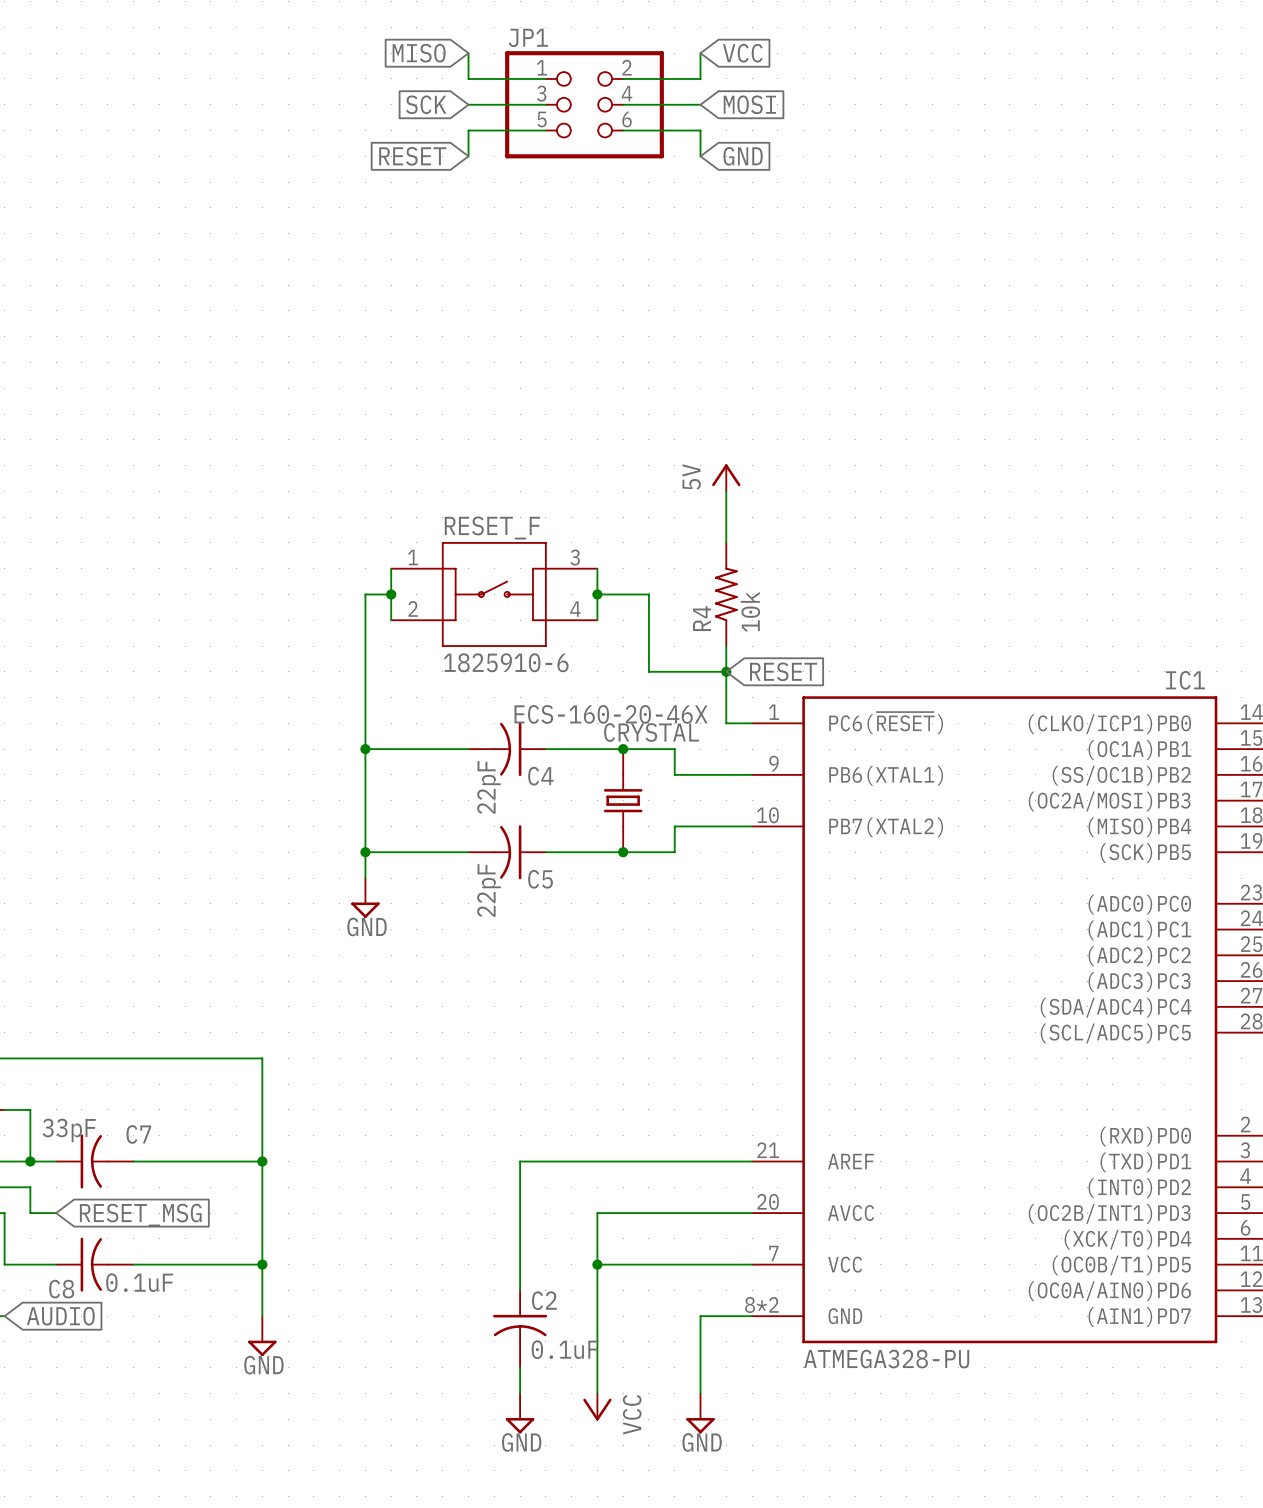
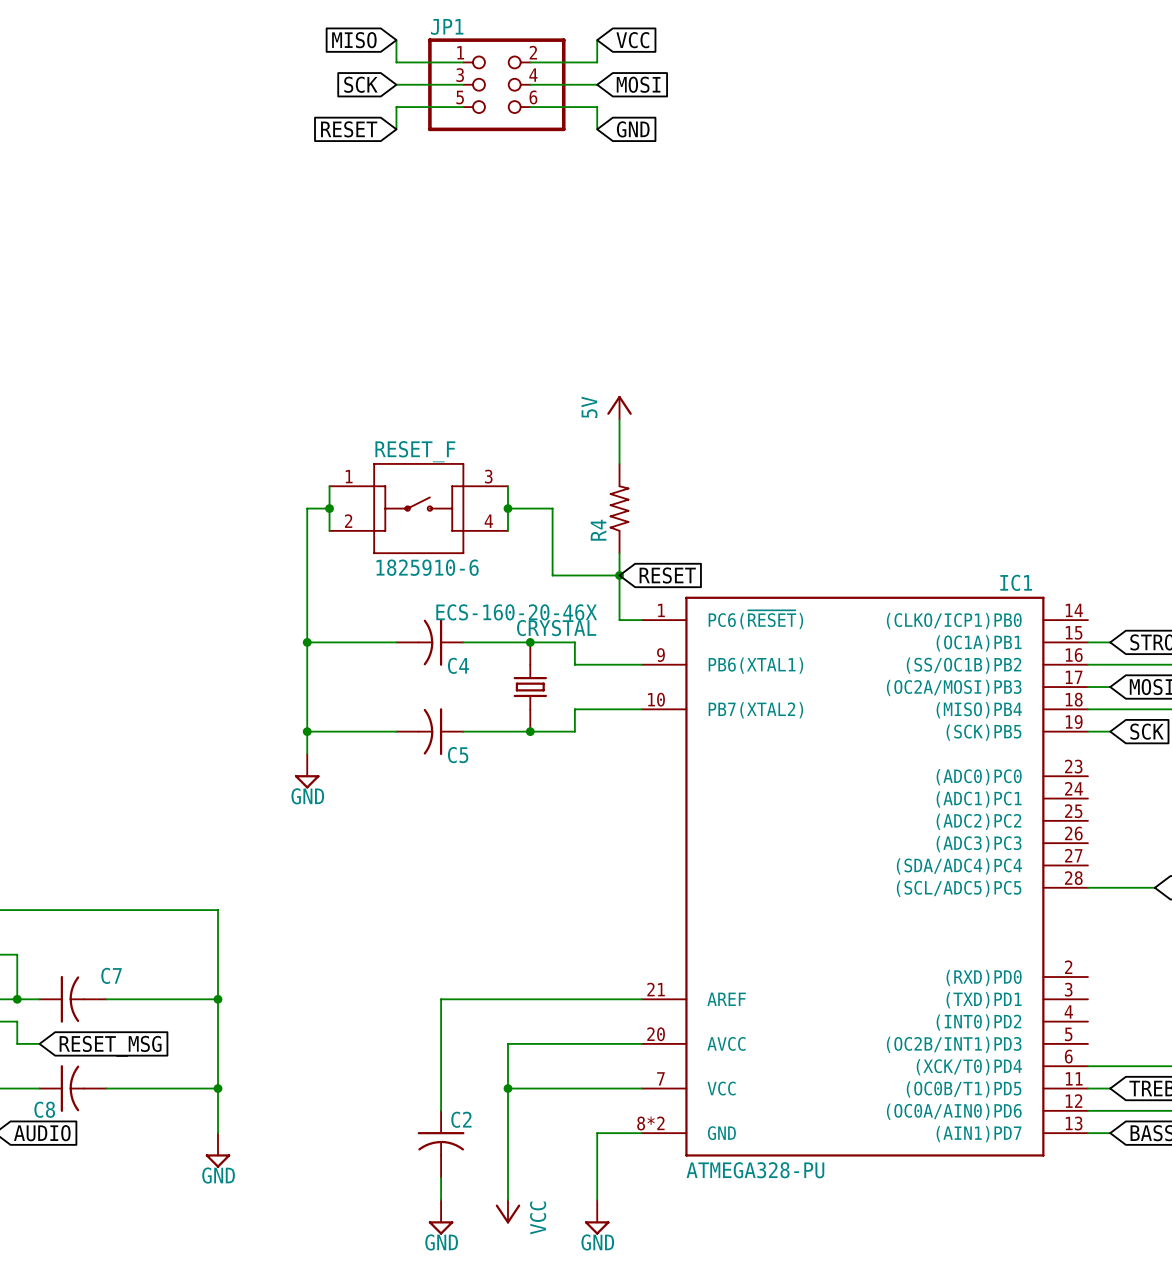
R4 value: 10k (750, 611) -> none
C4 value: 22pF (489, 787) -> none
C5 value: 22pF (489, 890) -> none
C7 value: 33pF (69, 1130) -> none
C8 value: 0.1uF (139, 1282) -> none
C2 value: 0.1uF (565, 1349) -> none

